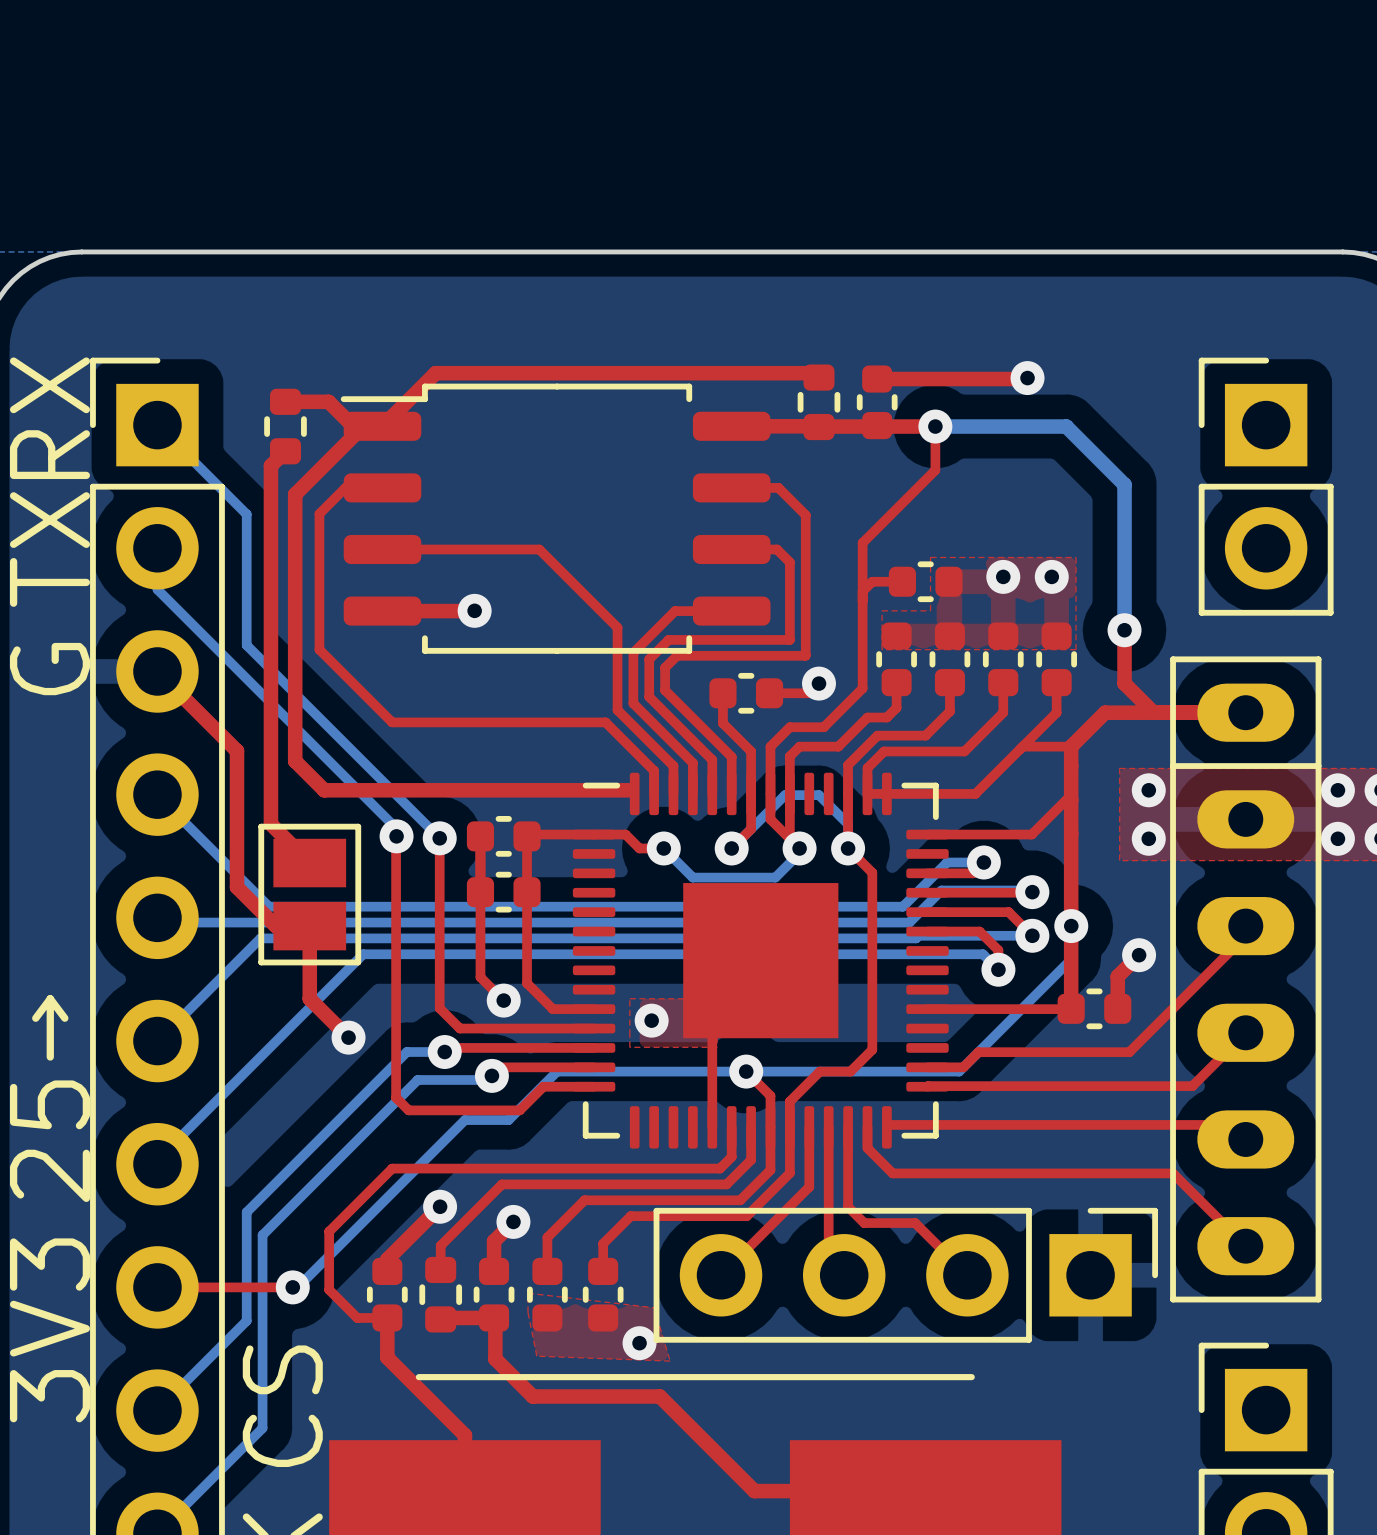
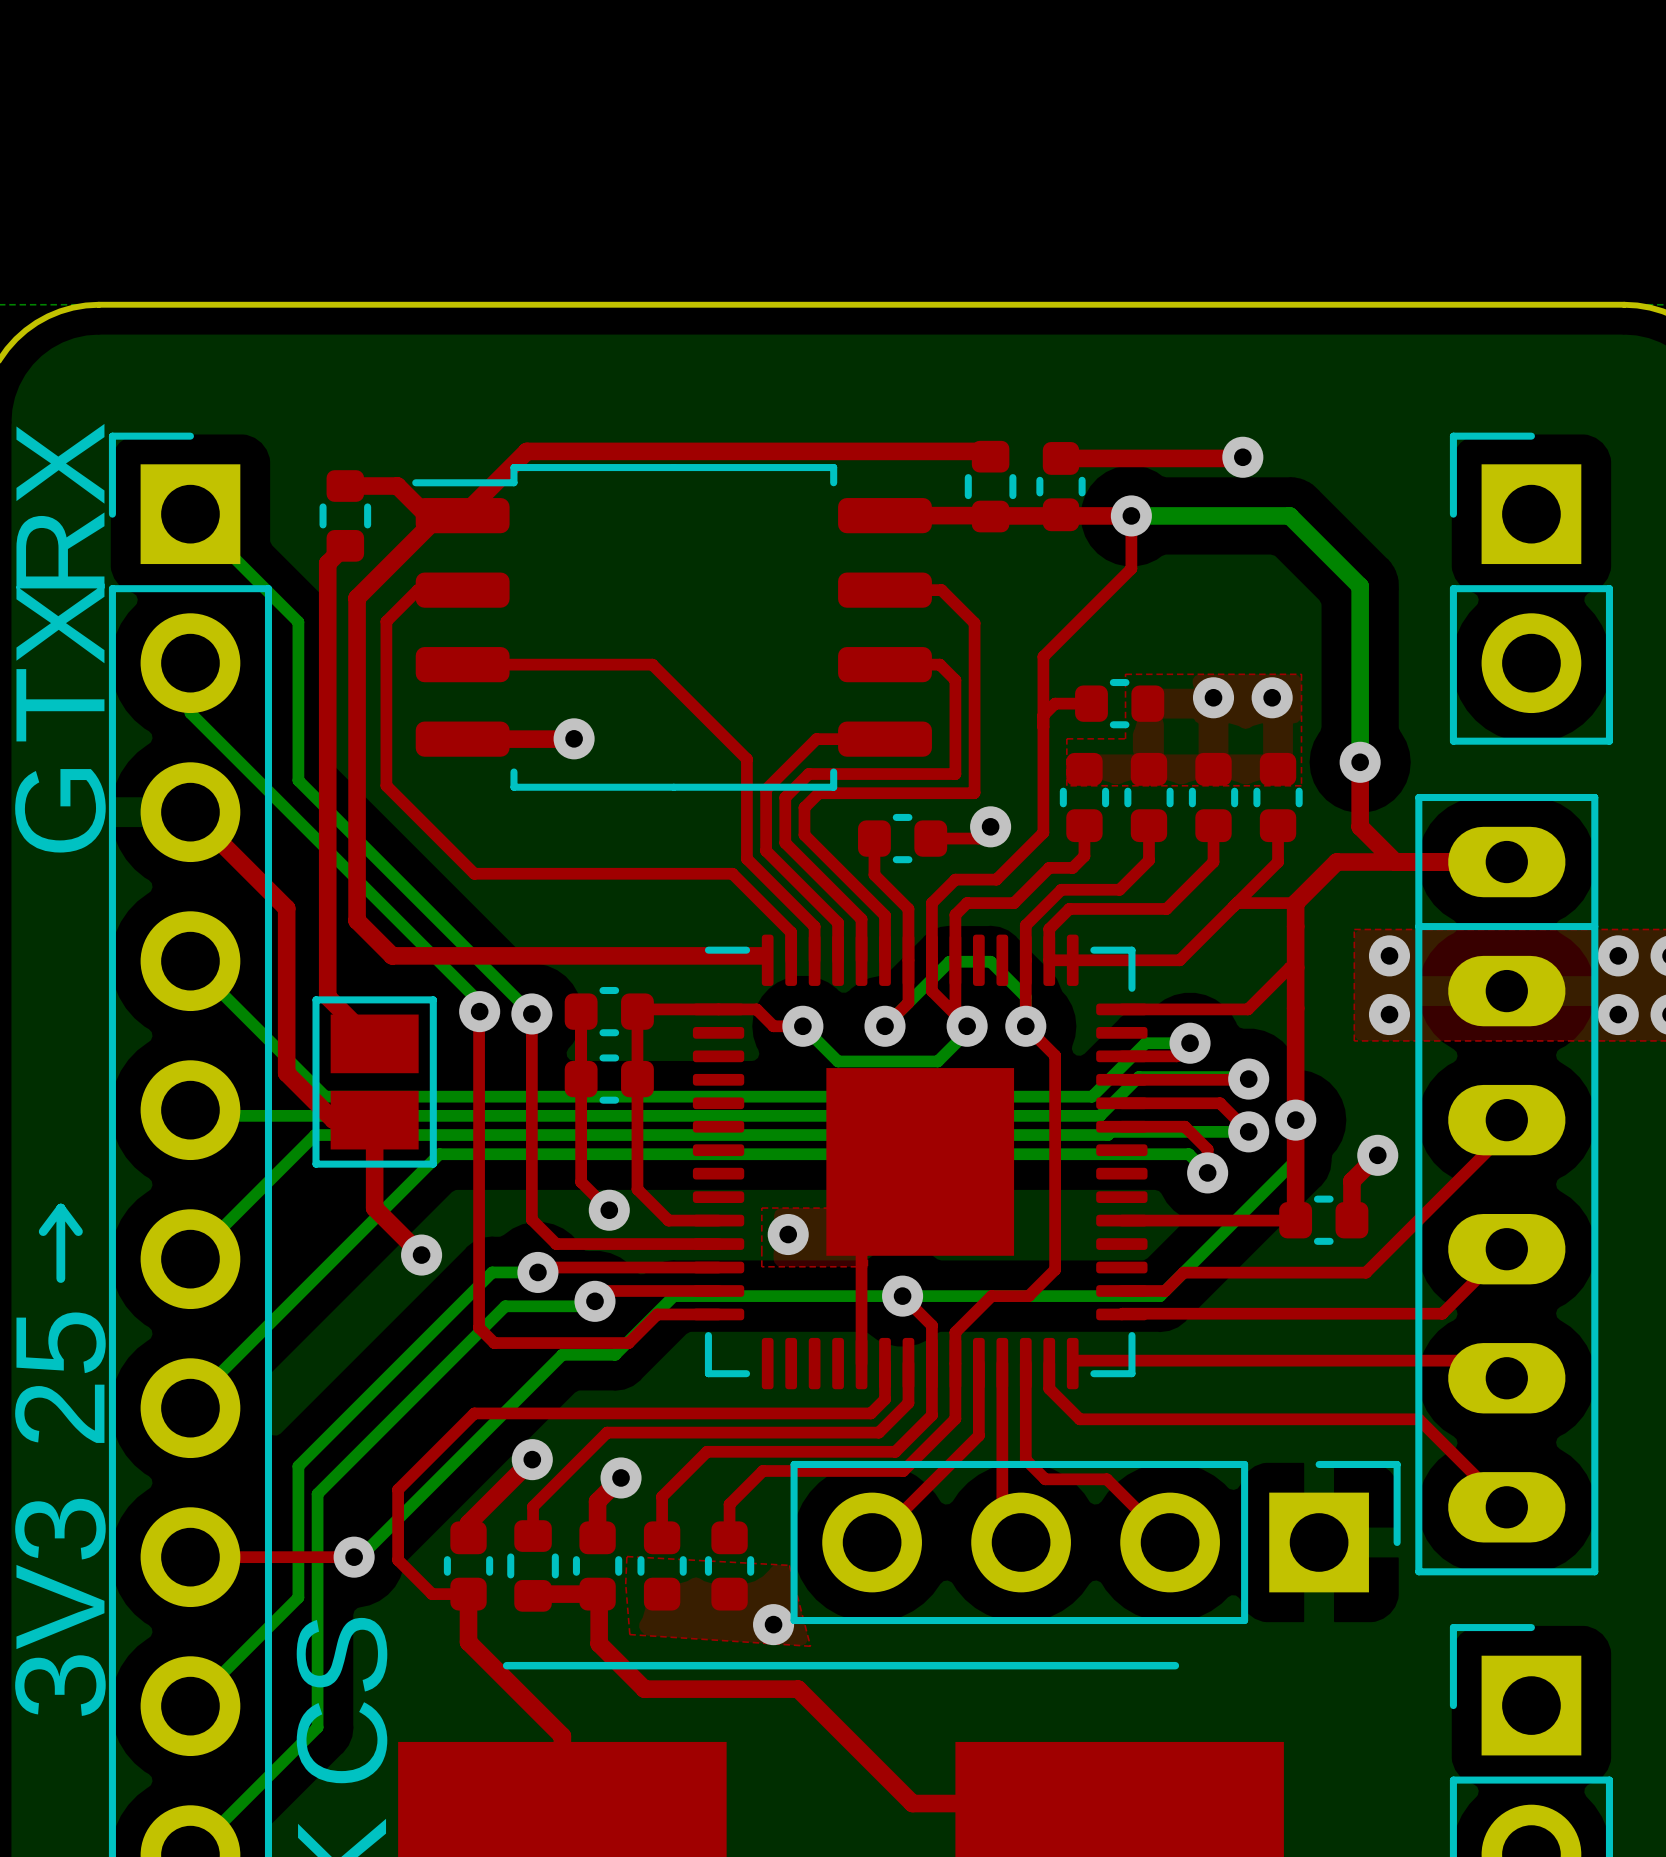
top zone outline: (528, 1293) (528, 1312) (536, 1356) (670, 1361) (654, 1307) (528, 1293) -> (626, 1556) (625, 1584) (629, 1634) (810, 1646) (789, 1565) (626, 1556)

